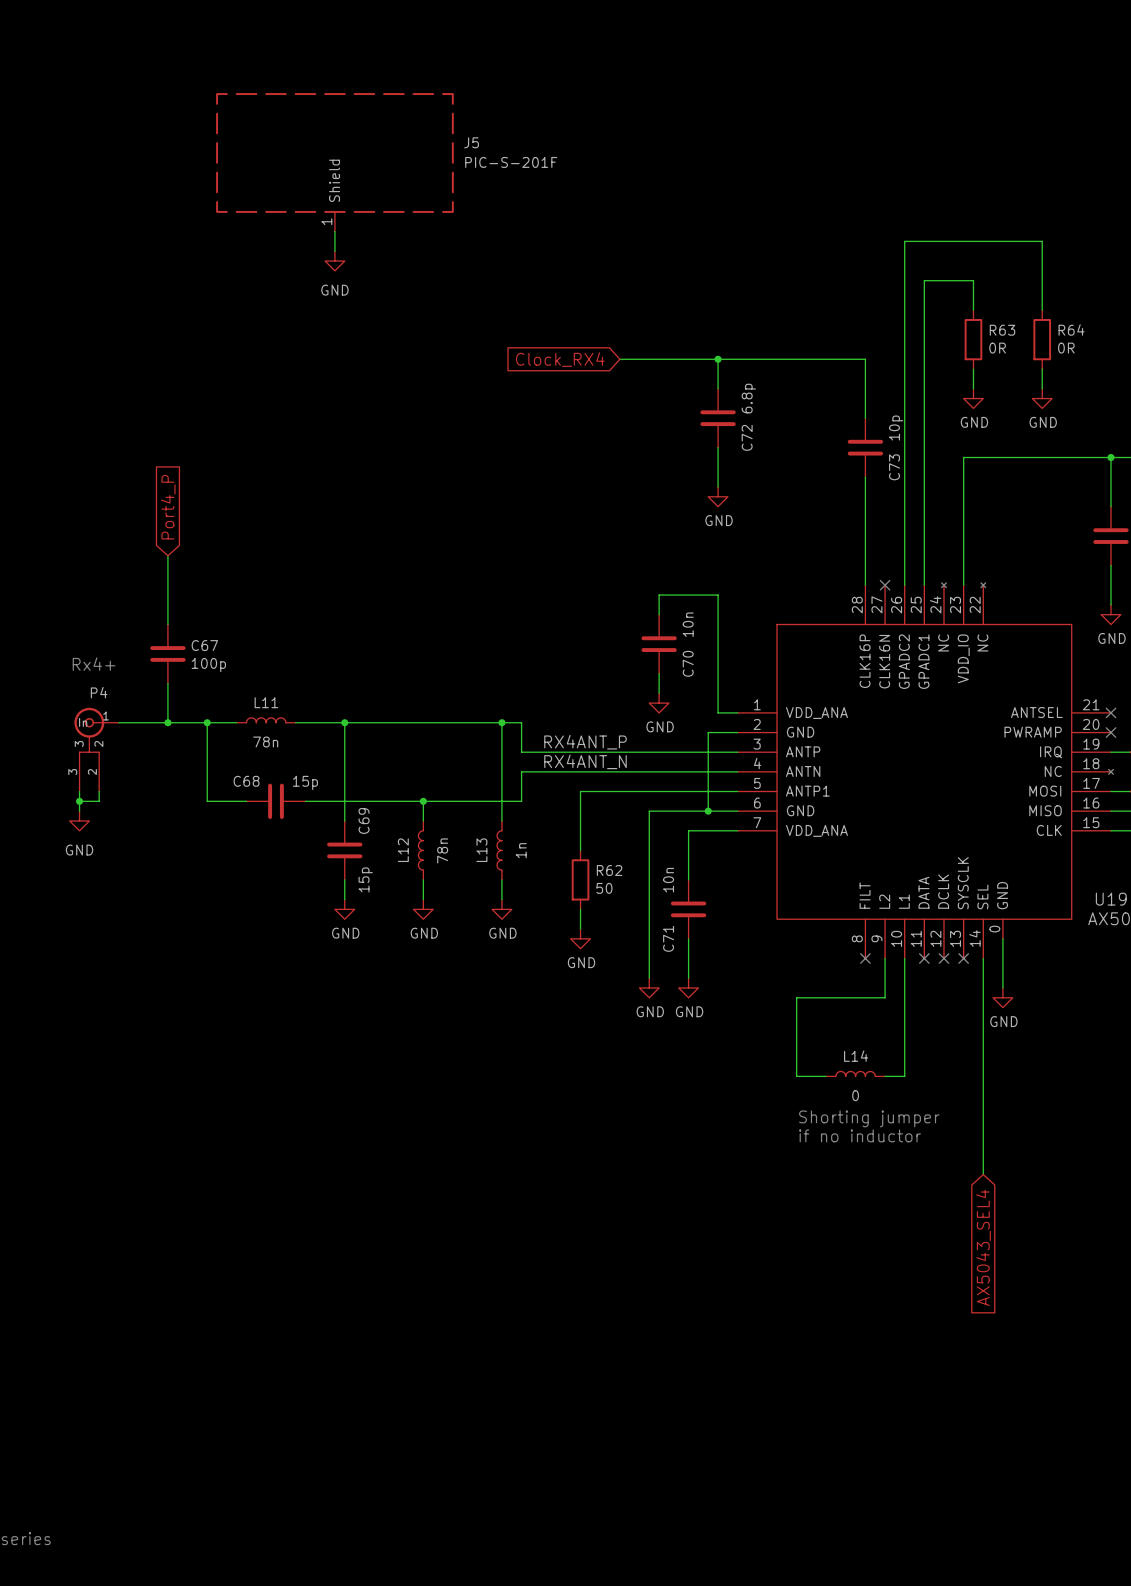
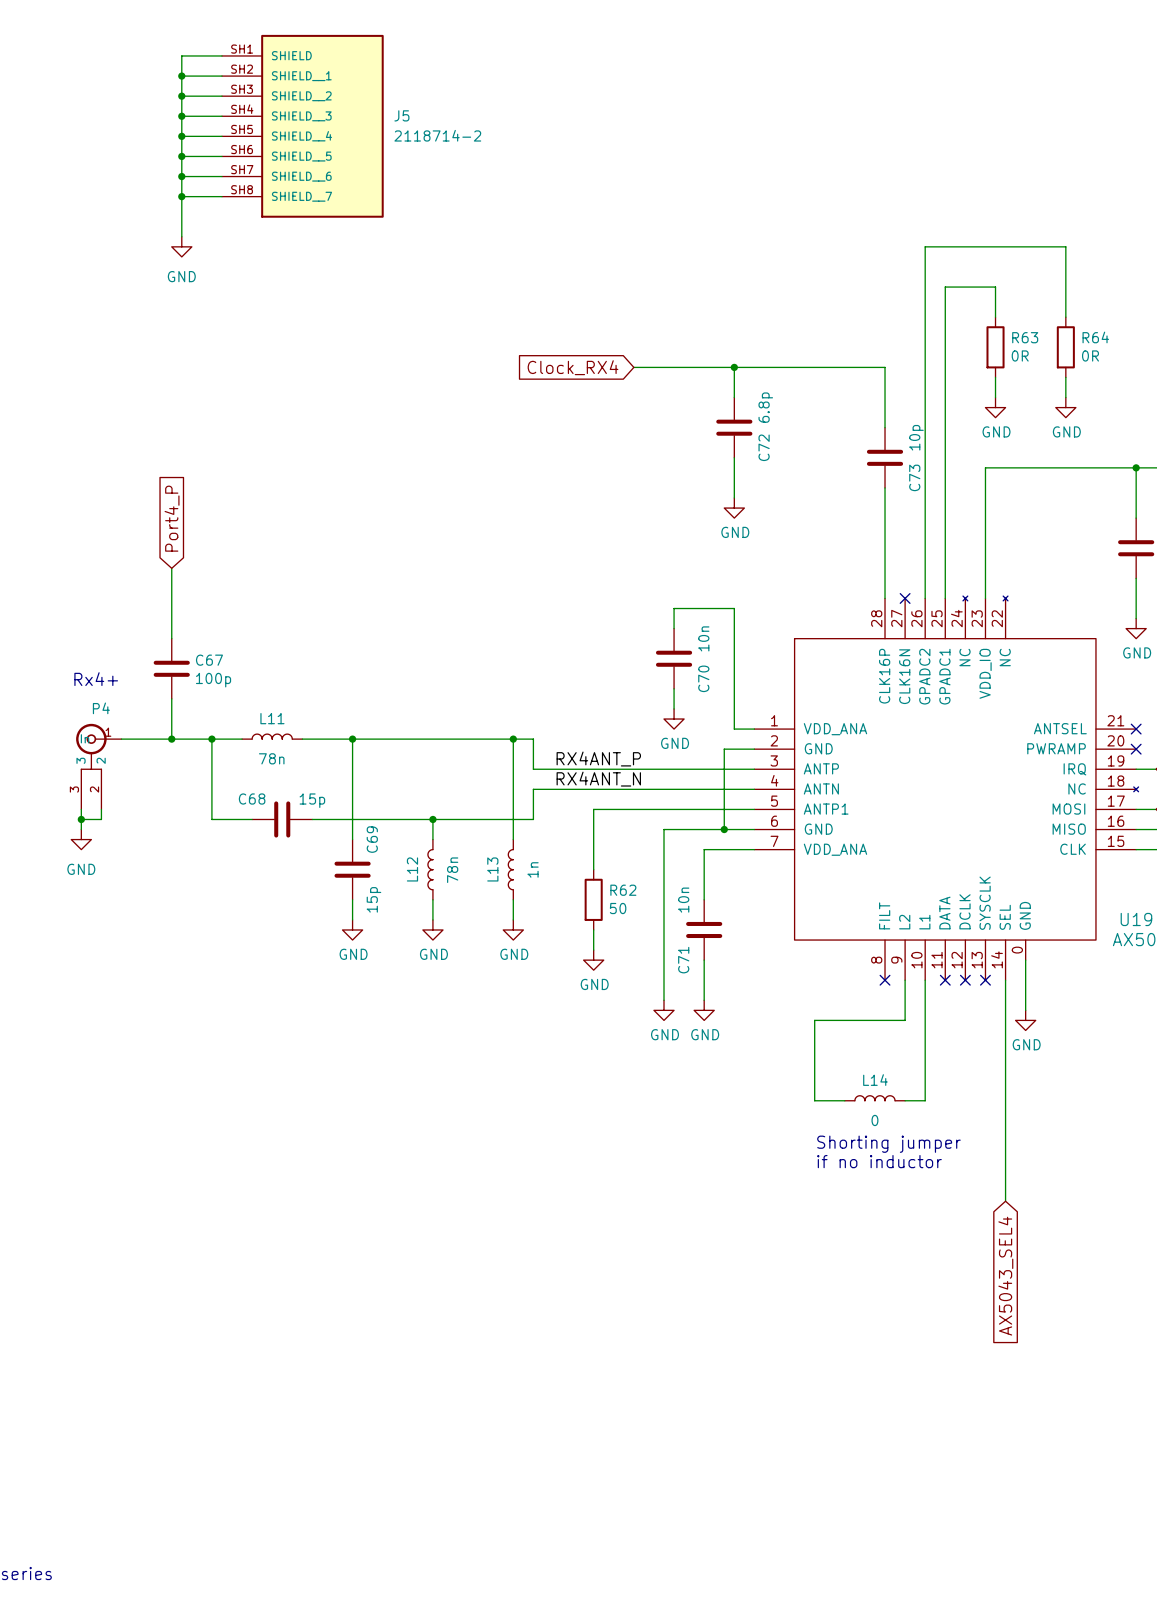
wire: none -> (221, 55) (181, 55) (181, 236)
wire: none -> (181, 76) (221, 76)
junction: none -> (181, 76)
J5 symbol: [216, 93, 454, 232] -> [221, 34, 384, 218]
wire: none -> (181, 96) (221, 96)
junction: none -> (181, 96)
wire: none -> (181, 116) (221, 116)
junction: none -> (181, 116)
wire: none -> (181, 136) (221, 136)
junction: none -> (181, 136)
J5 name position: J5 (471, 142) -> J5 (401, 115)
wire: none -> (181, 156) (221, 156)
junction: none -> (181, 156)
J5 value: PIC-S-201F (511, 162) -> 2118714-2 (437, 135)
wire: none -> (181, 176) (221, 176)
junction: none -> (181, 176)
wire: none -> (181, 196) (221, 196)
junction: none -> (181, 196)
wire: (334, 231) (334, 251) -> none
power symbol position: GND (334, 261) -> GND (181, 246)

